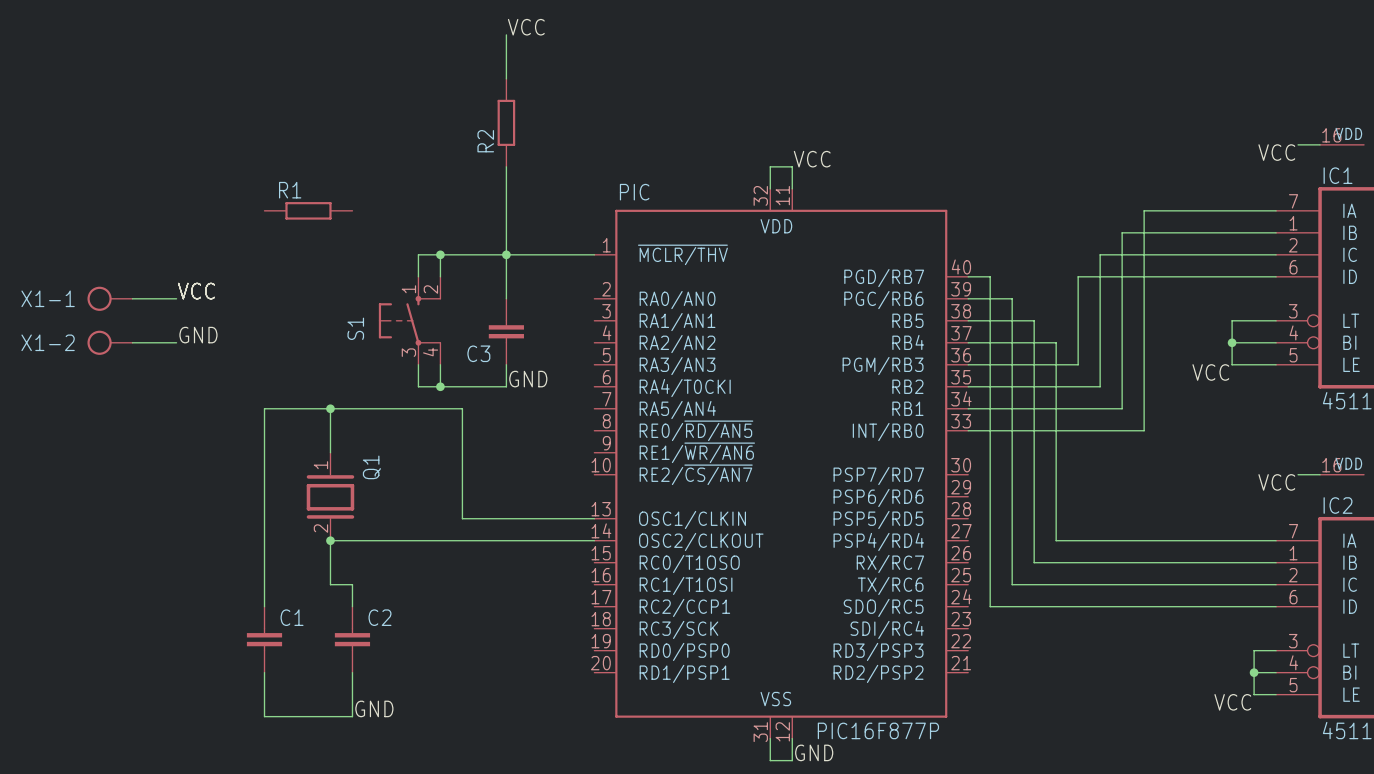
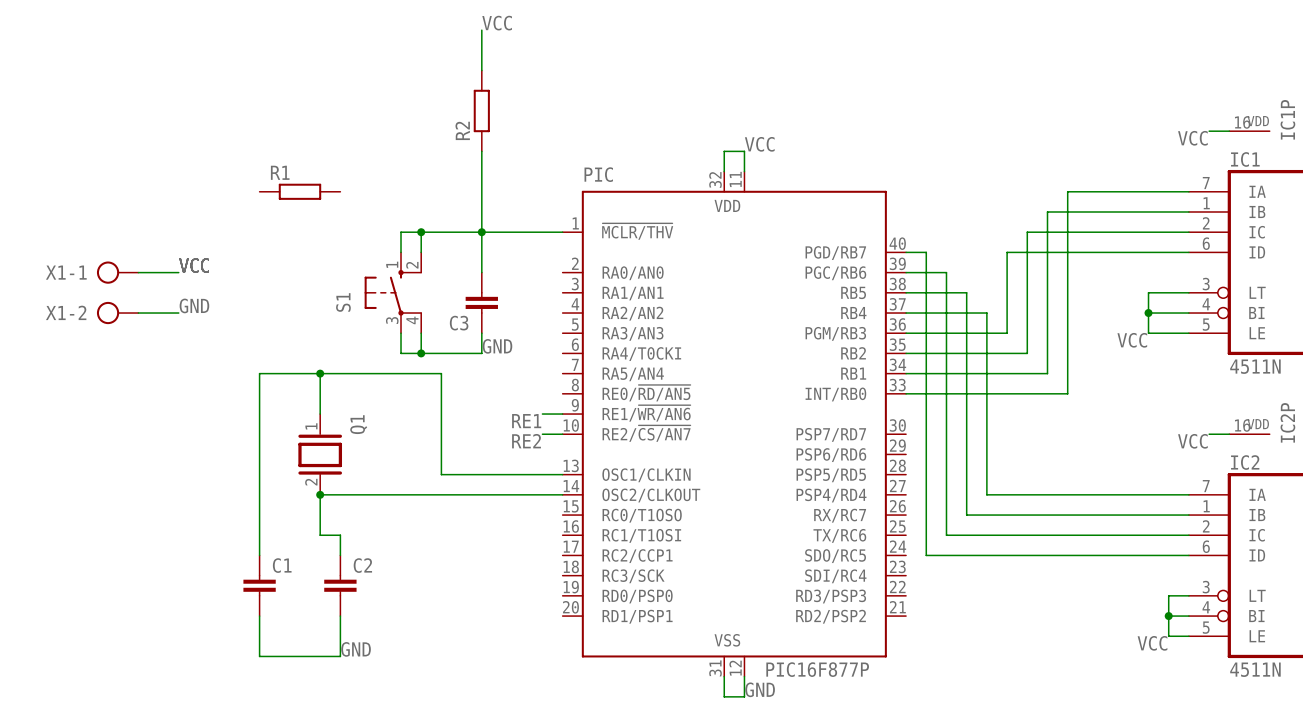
wire: none -> (542, 414) (562, 414)
label: none -> RE1 (526, 421)
wire: none -> (542, 434) (562, 434)
label: none -> RE2 (526, 441)

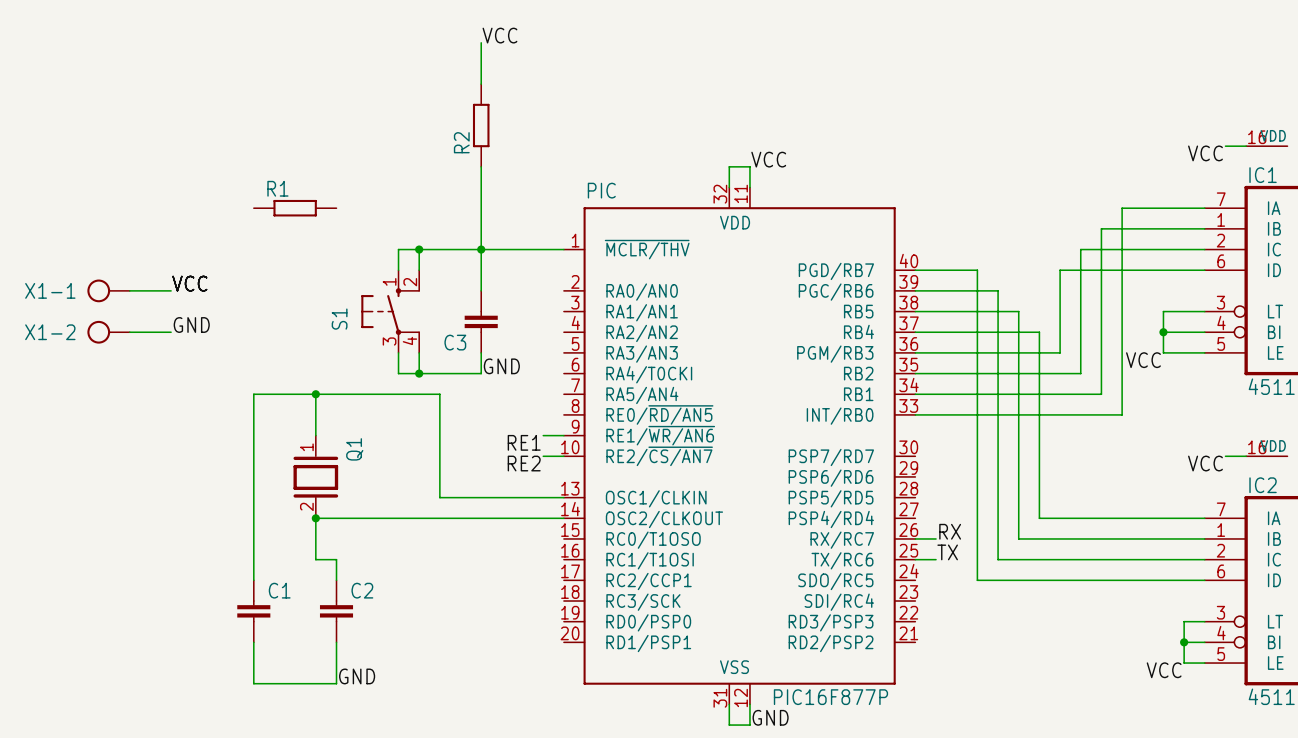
wire: (1108, 191) (1067, 191) (1067, 232) (1027, 232) (1027, 313) -> (1122, 208) (1122, 414) (1080, 414)
wire: (1087, 211) (1047, 211) (1047, 252) (1007, 252) (1007, 292) -> (1101, 228) (1101, 394) (1060, 394)
wire: (926, 252) (926, 555) (966, 555) -> (936, 270) (977, 270) (977, 311) (1018, 311)
wire: (946, 272) (946, 535) (986, 535) -> (956, 290) (998, 290) (998, 332) (1039, 332)
wire: (1047, 333) (1047, 373) -> (1060, 352) (1018, 352) (1018, 538)
wire: (1067, 353) (1067, 393) -> (1080, 373) (1039, 373) (1039, 518)
wire: (986, 494) (1027, 494) -> (998, 518) (998, 559)
label: none -> RX (950, 531)
wire: none -> (915, 538) (936, 538)
wire: (966, 515) (1007, 515) -> (977, 538) (977, 580)
label: none -> TX (947, 552)
wire: none -> (915, 559) (936, 559)

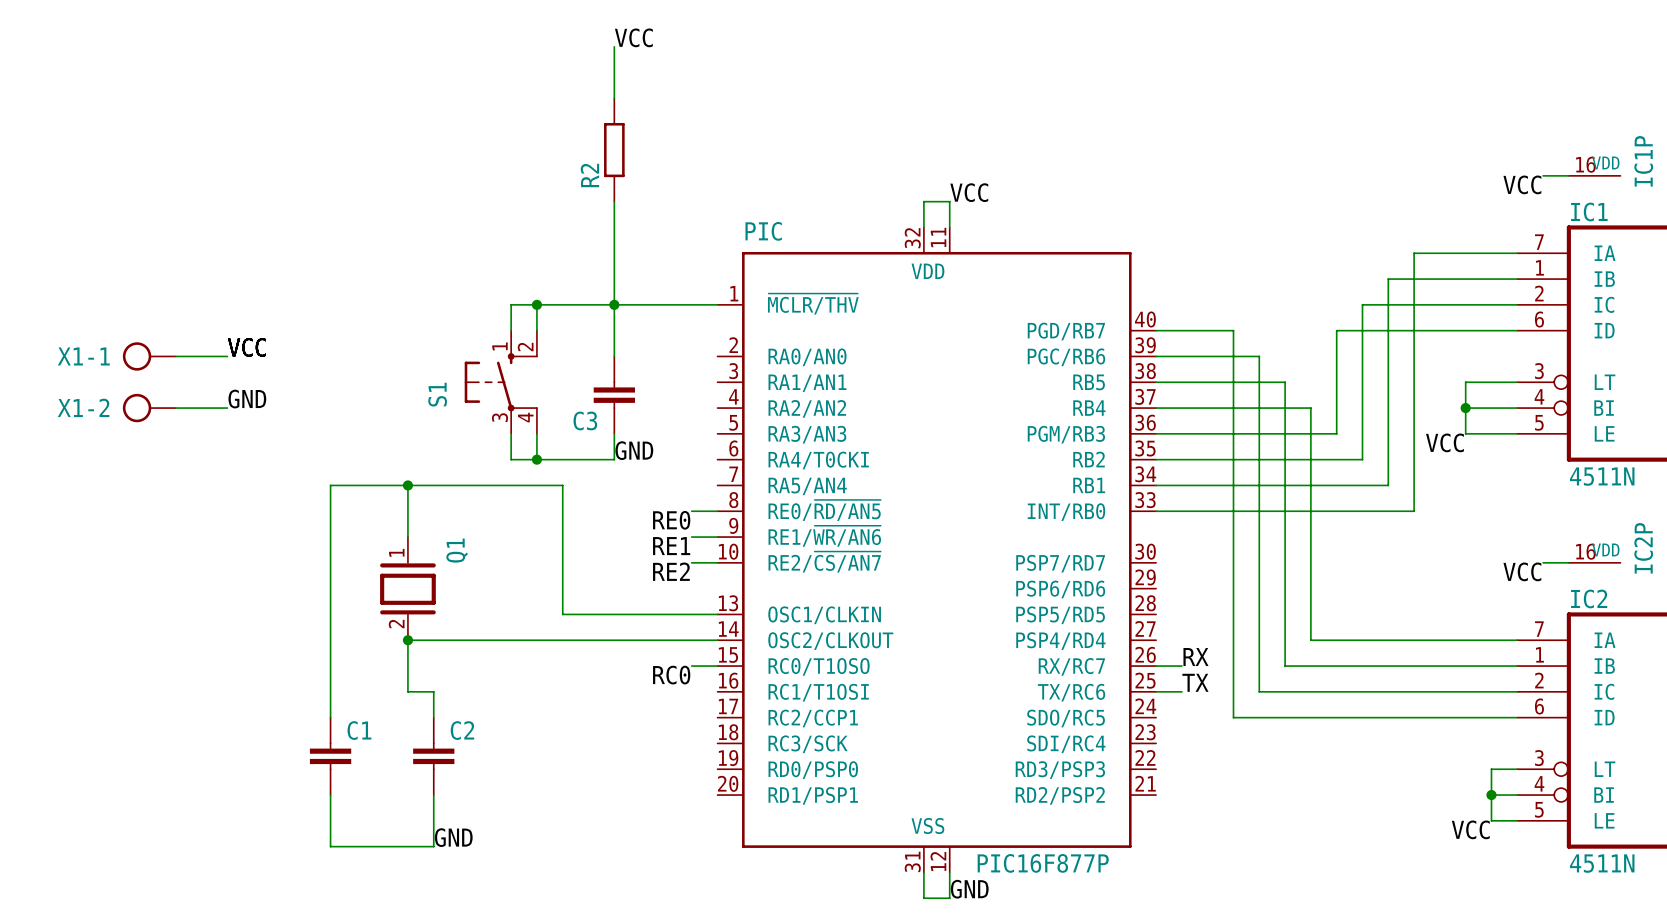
R1: (295, 208) -> none
wire: none -> (691, 511) (717, 511)
label: none -> RE0 (671, 520)
wire: none -> (691, 666) (717, 666)
label: none -> RC0 (671, 675)

